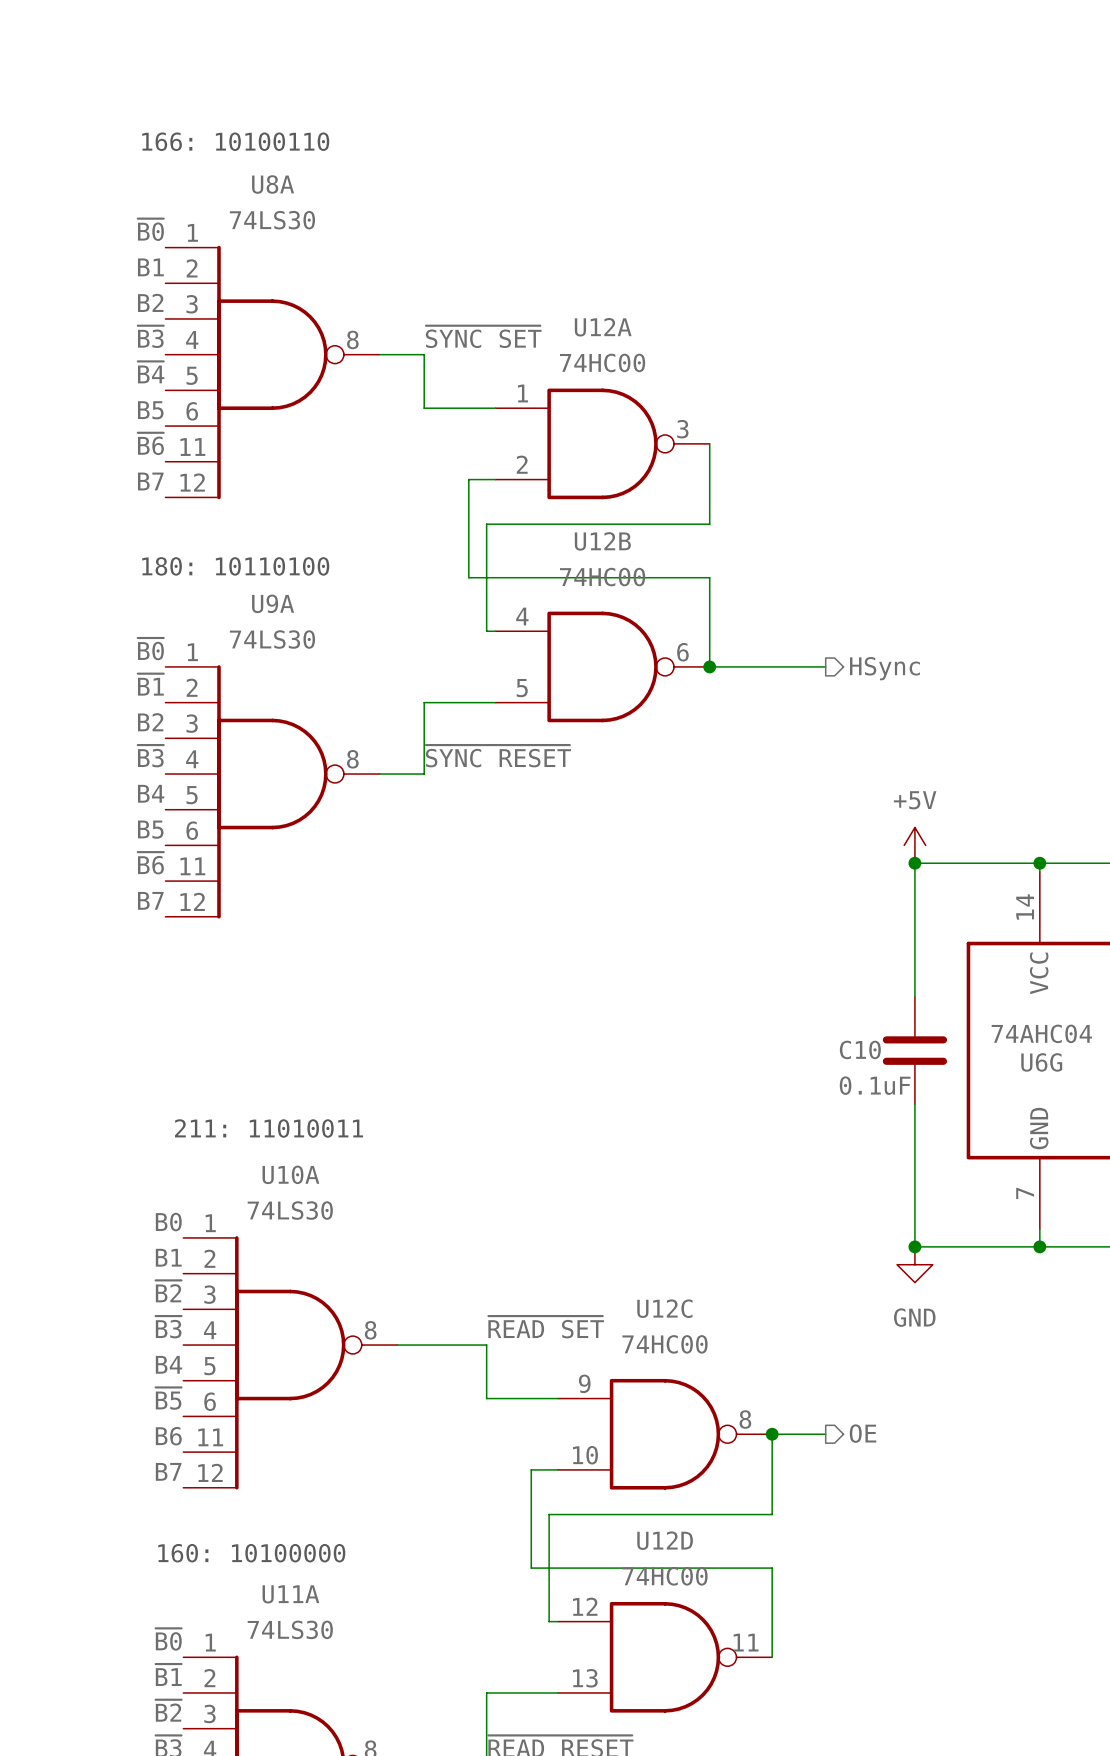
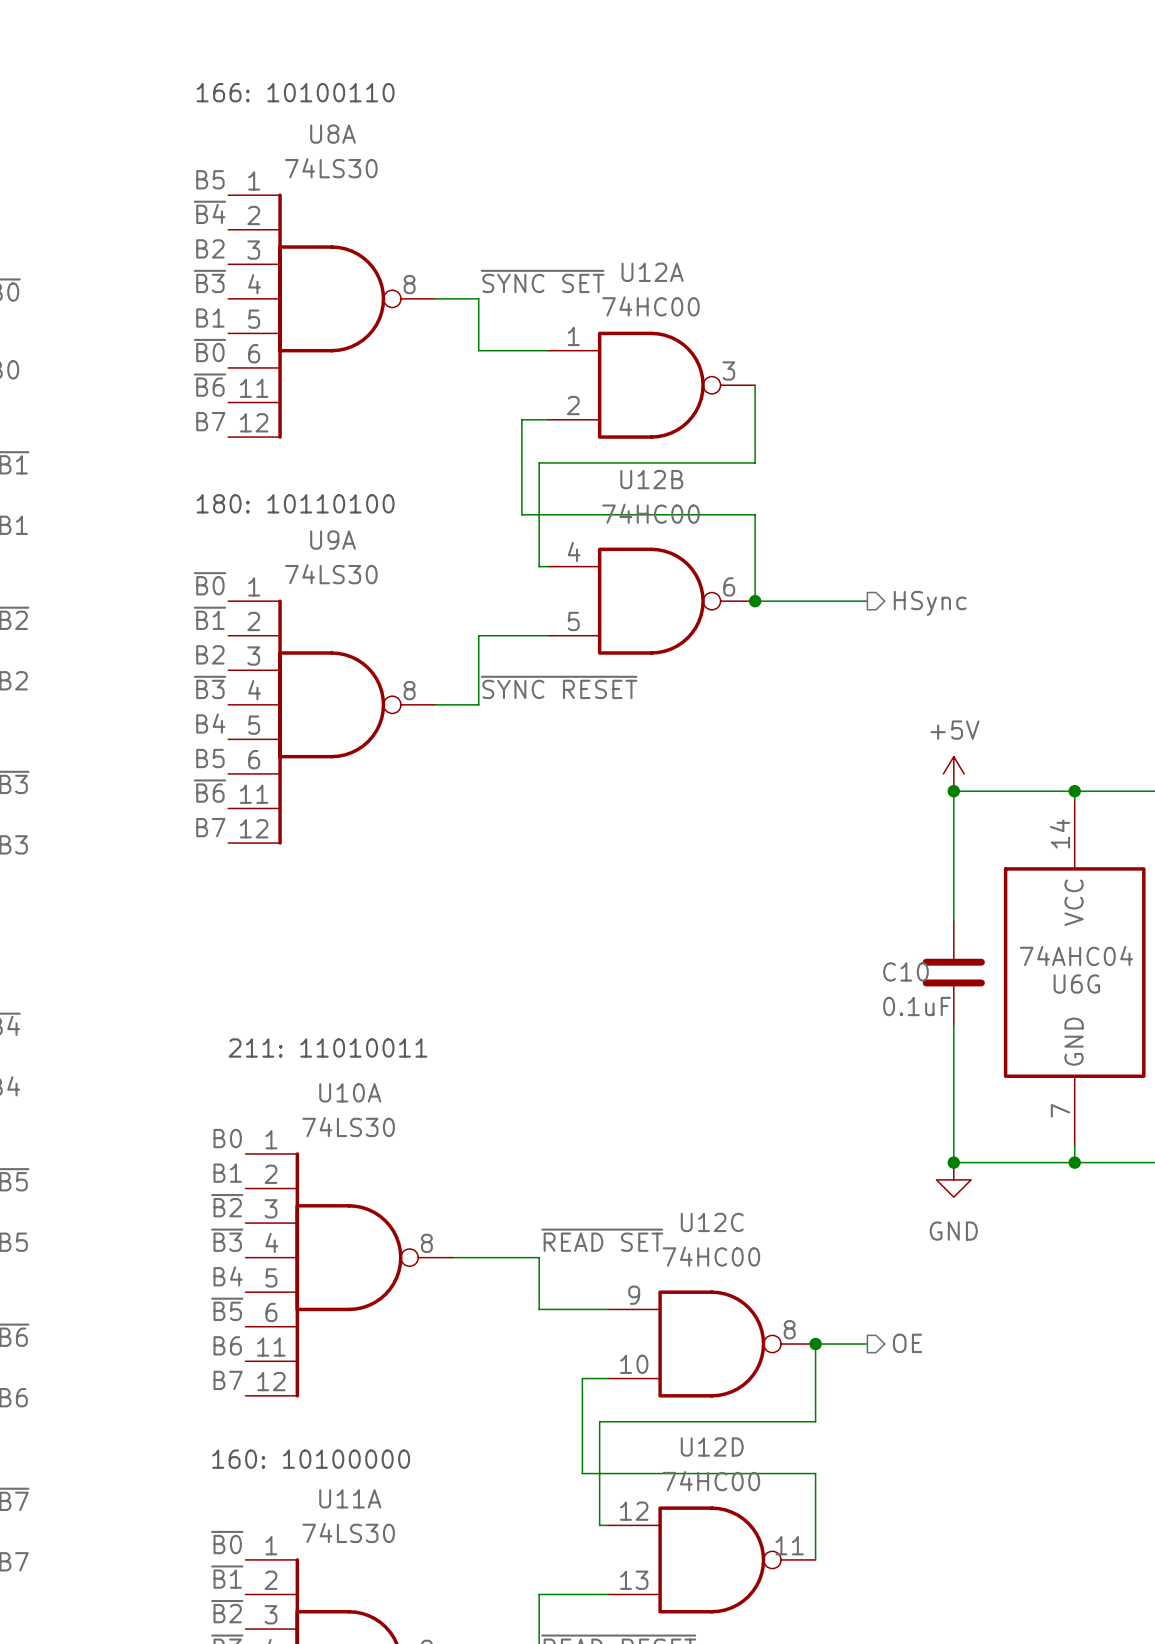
label: ~{B0} (150, 229) -> B5 (210, 179)
label: B1 (150, 267) -> ~{B4} (210, 212)
label: ~{B4} (151, 372) -> B1 (210, 317)
label: B5 (150, 410) -> ~{B0} (210, 350)

